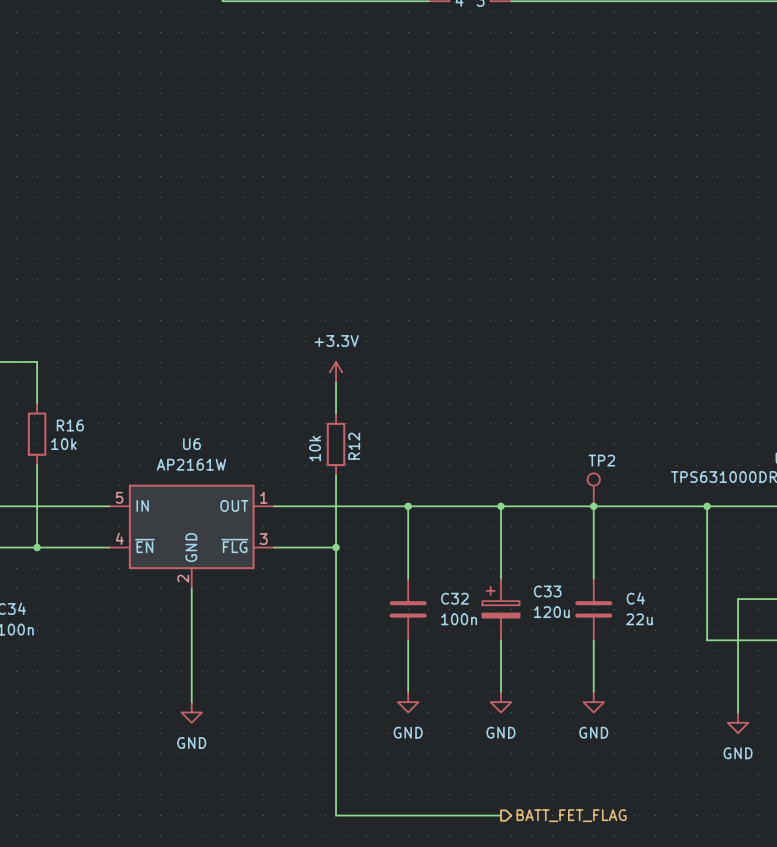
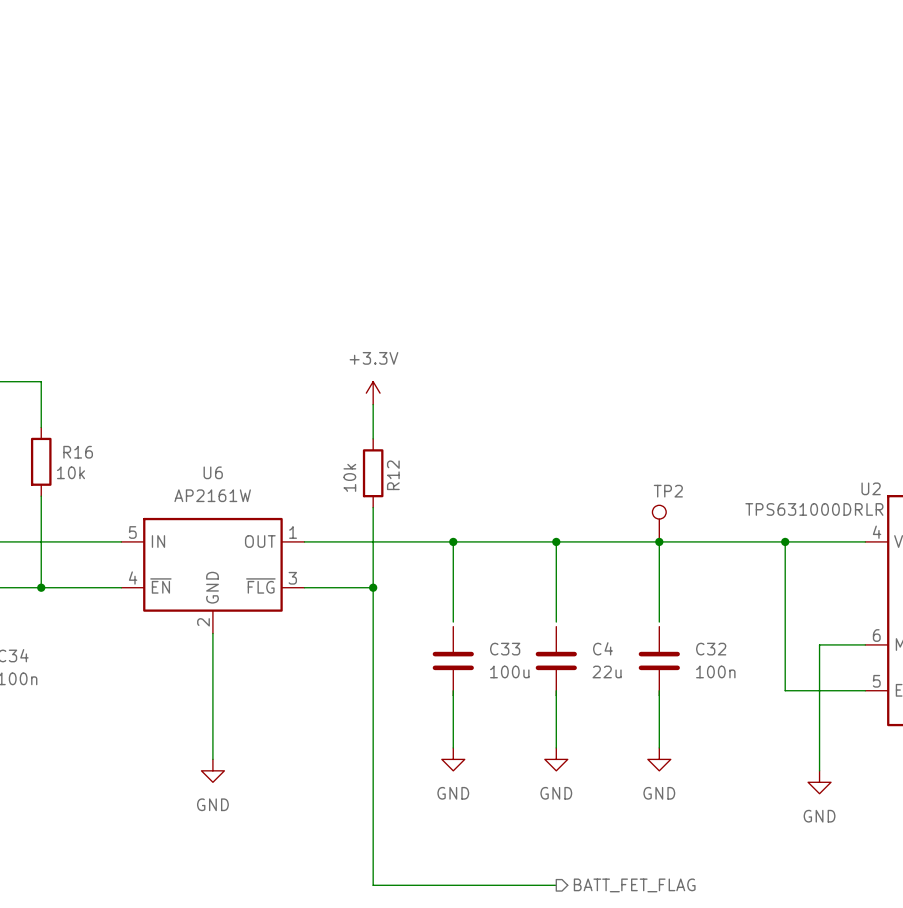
C33 symbol: [482, 578, 520, 641] -> [432, 626, 474, 696]
C32 position: (408, 609) -> (659, 660)
C4 position: (593, 609) -> (556, 660)
C33 value: 120u (551, 612) -> 100u (509, 671)

